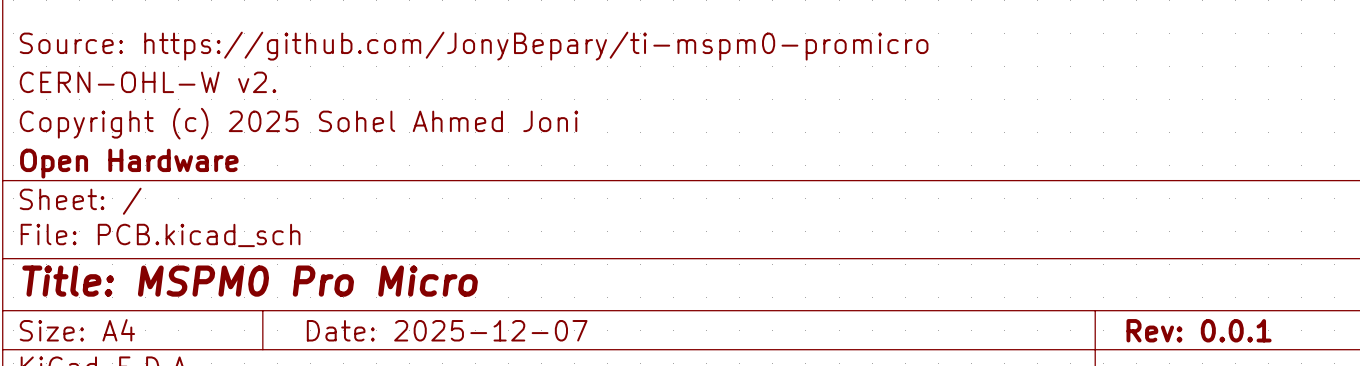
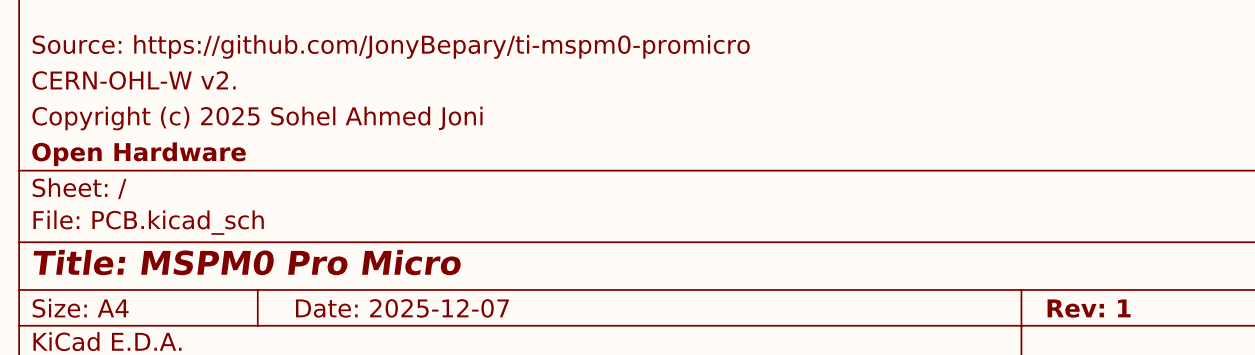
title block: Rev: 0.0.1 (1199, 330) -> Rev: 1 (1089, 308)

